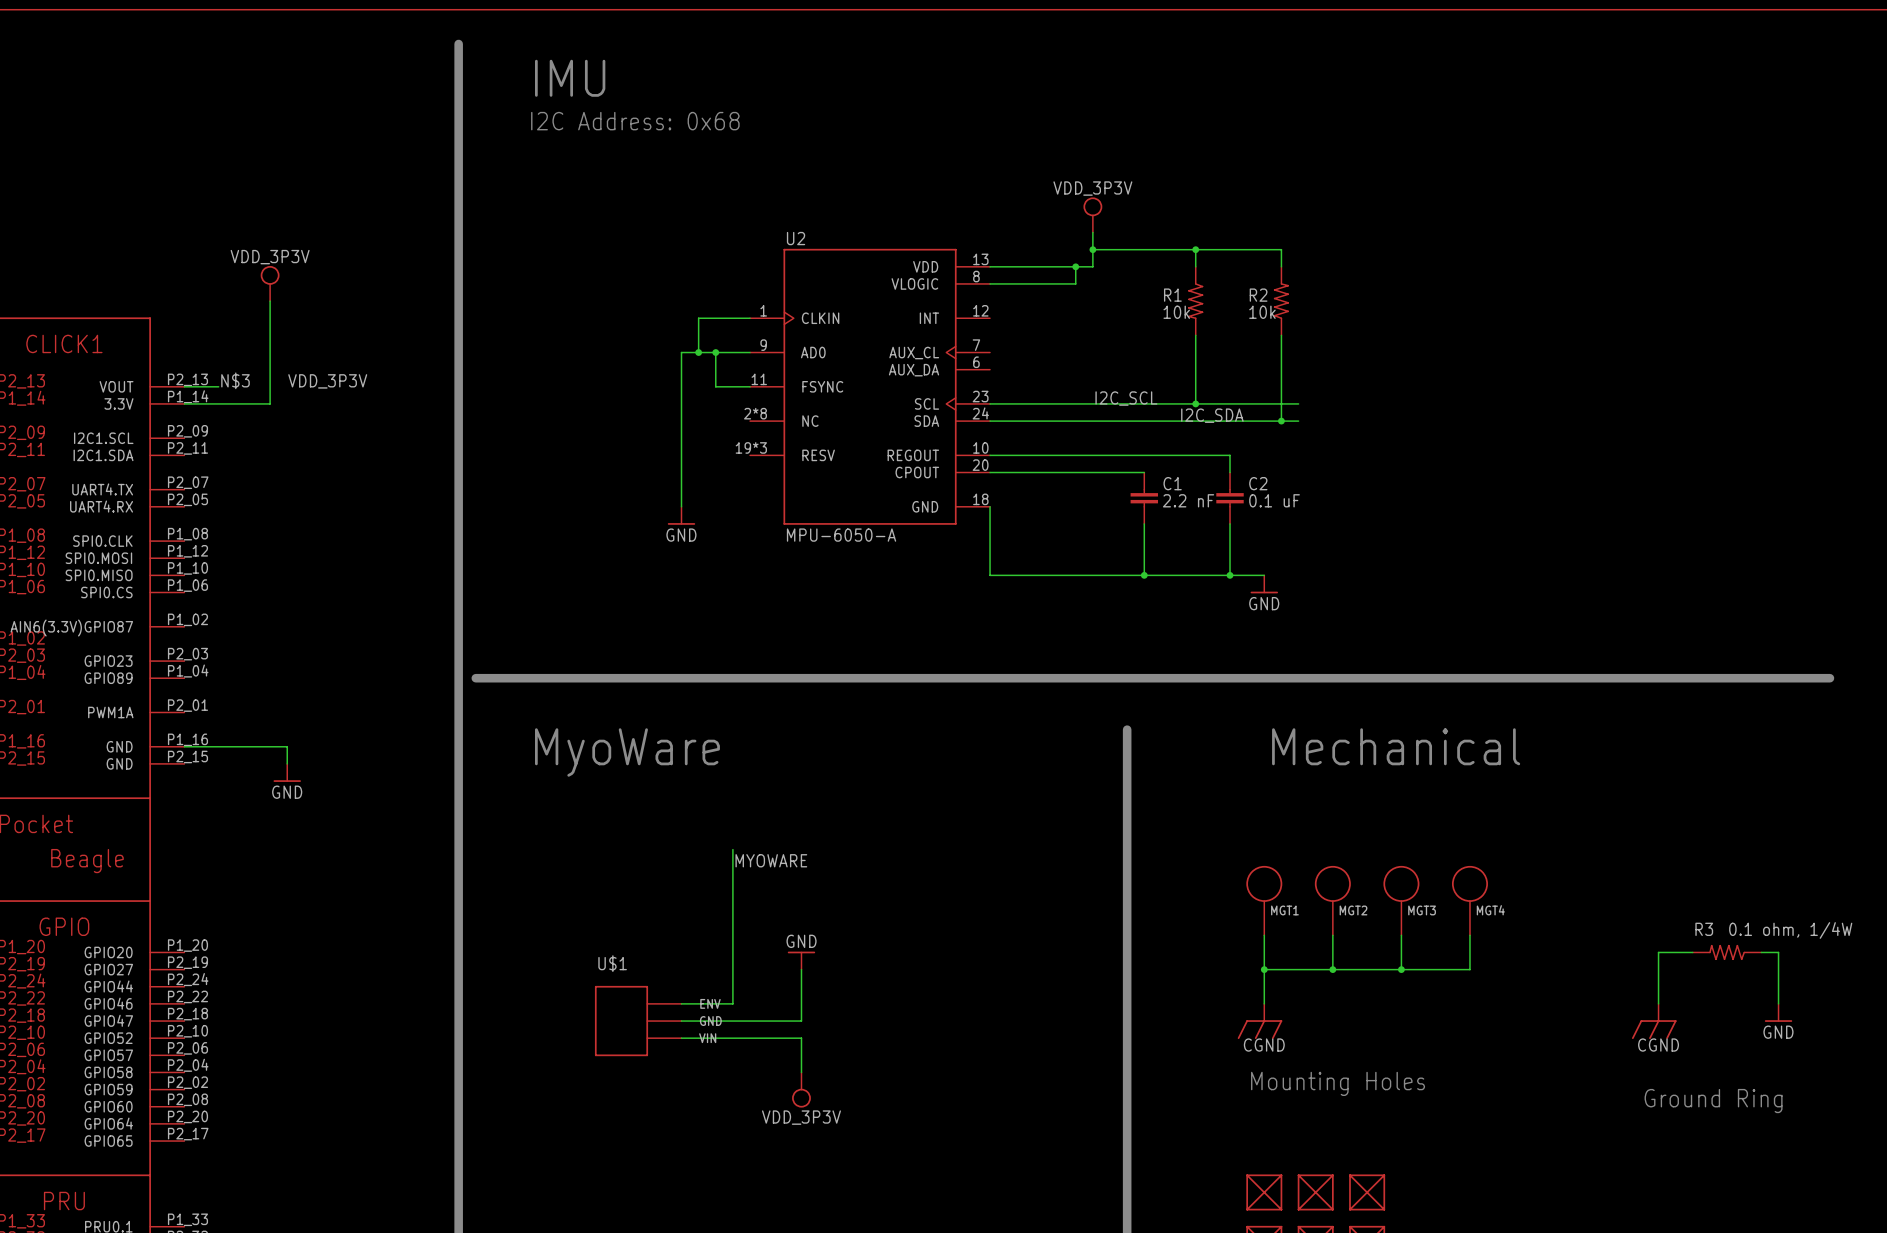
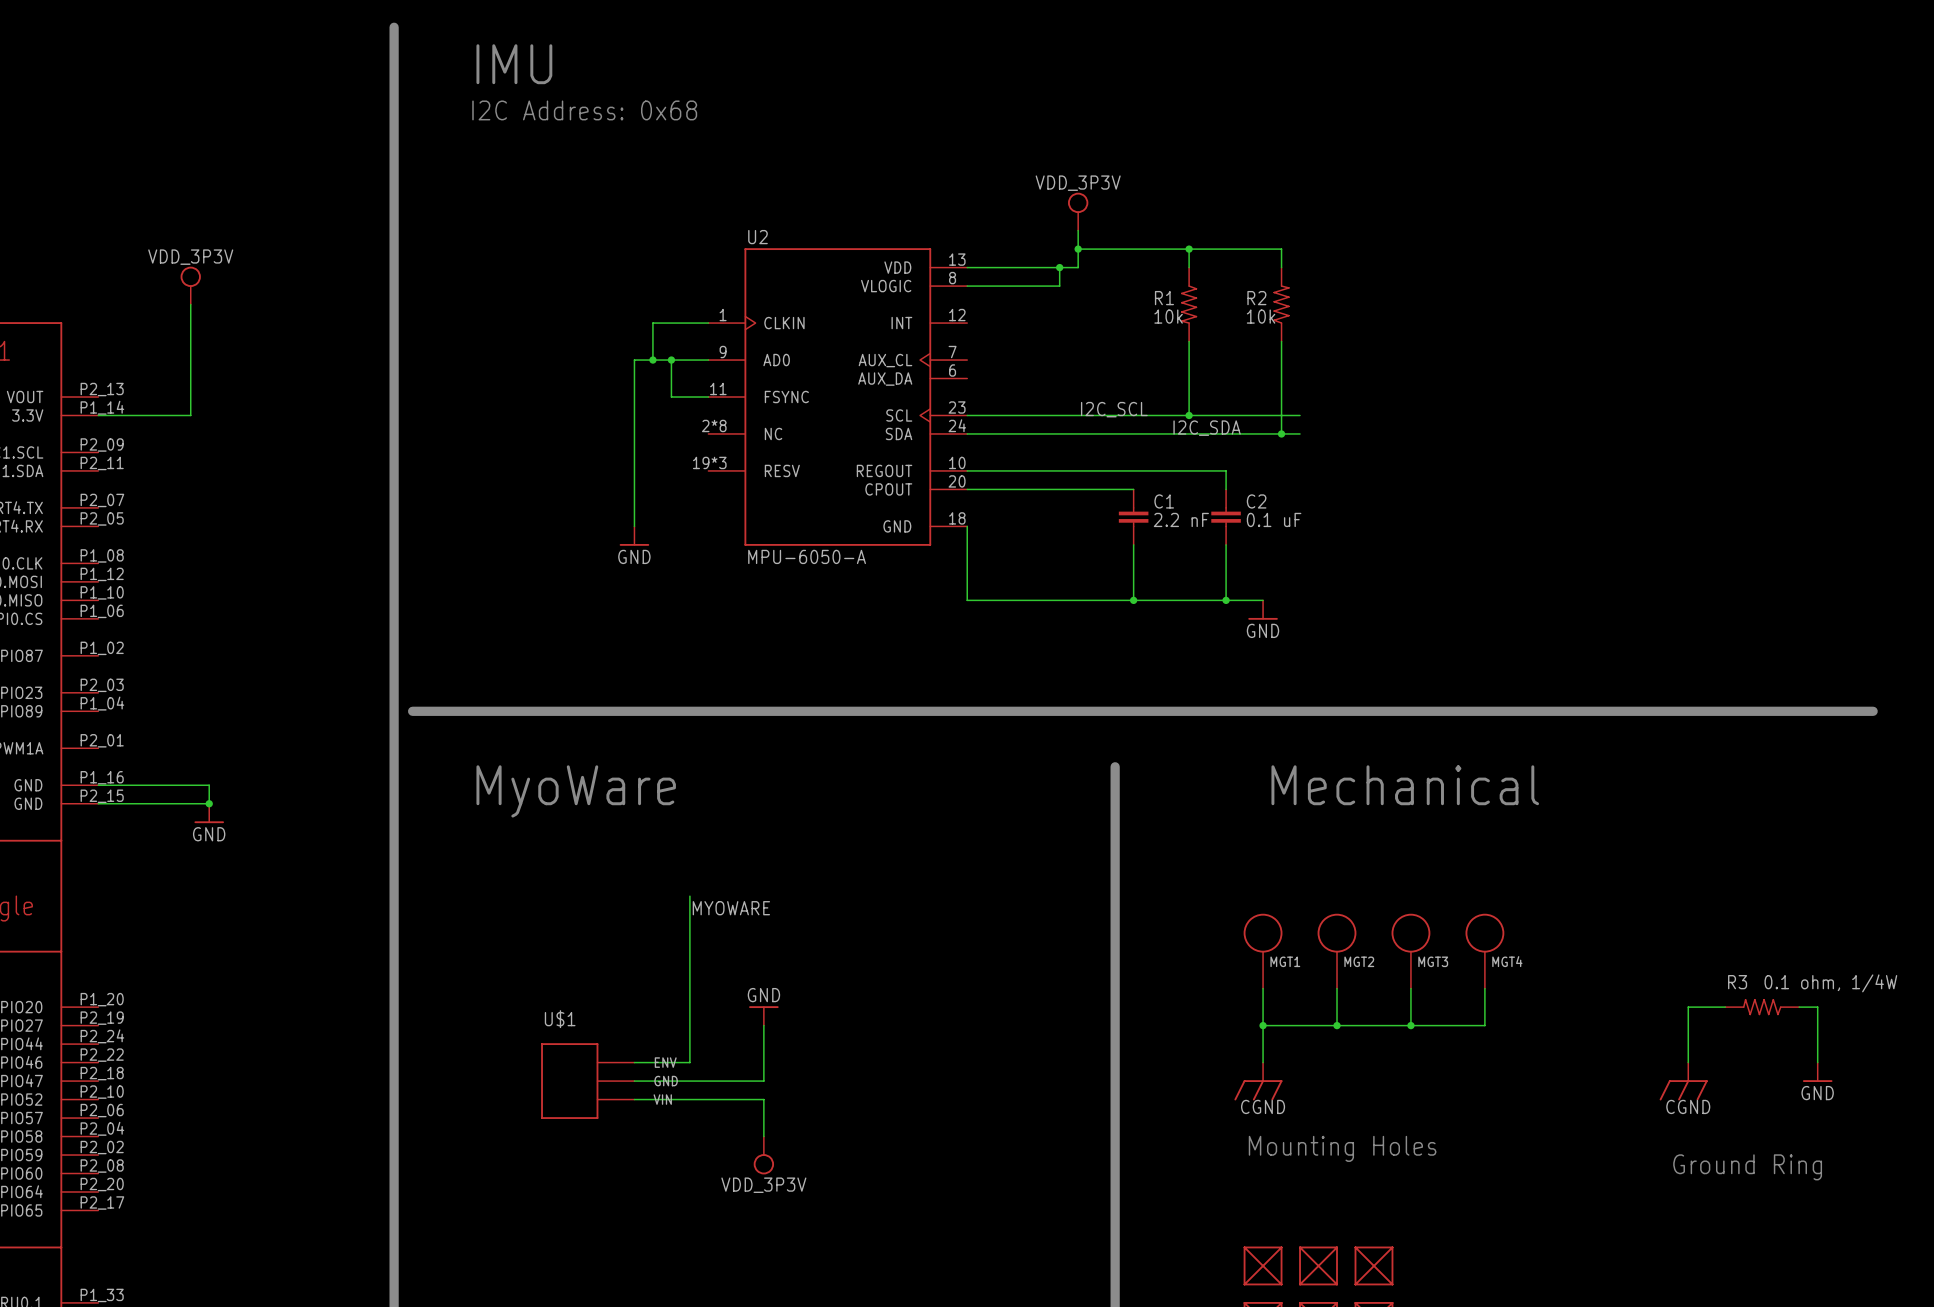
label: N$3 (235, 380) -> none
label: VDD_3P3V (327, 381) -> none
wire: (184, 386) (218, 386) -> none
wire: none -> (98, 803) (209, 803)
junction: none -> (209, 803)

